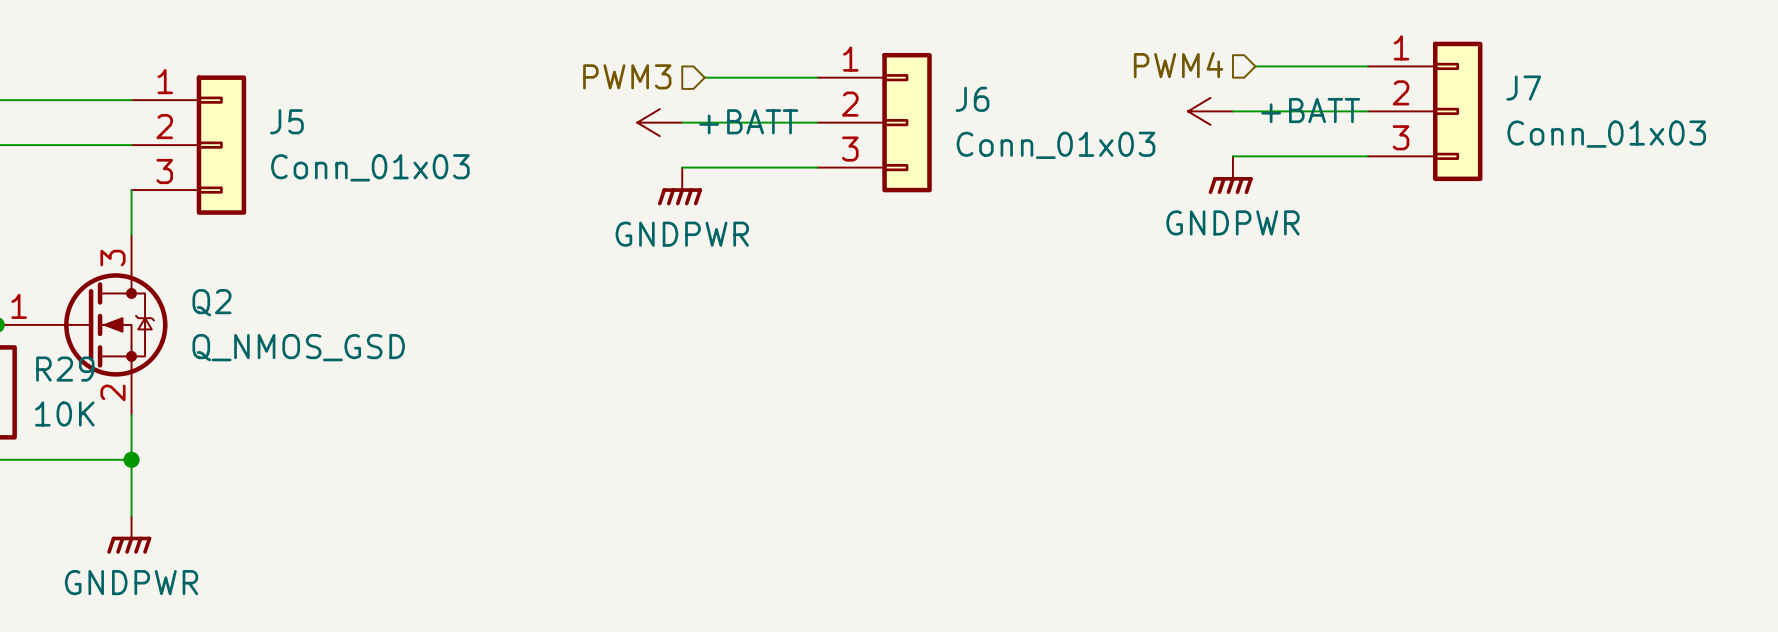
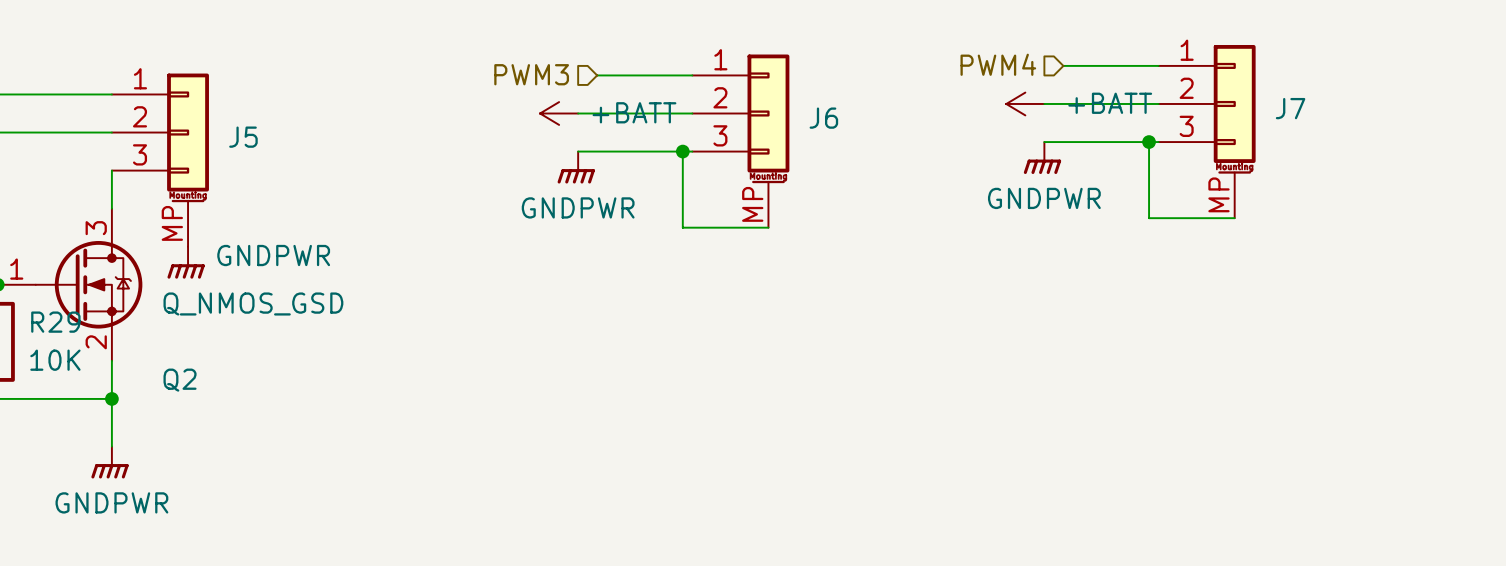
J7 symbol: [1367, 41, 1483, 182] -> [1158, 44, 1256, 219]
J6 symbol: [817, 52, 932, 193] -> [692, 54, 790, 228]
J5 symbol: [131, 75, 247, 215] -> [111, 73, 209, 247]
J7 value: Conn_01x03 (1606, 134) -> none
J6 value: Conn_01x03 (1055, 145) -> none
wire: none -> (1149, 142) (1149, 218) (1234, 218)
junction: none -> (1149, 142)
J5 value: Conn_01x03 (370, 167) -> none
wire: none -> (682, 151) (682, 227) (768, 227)
junction: none -> (682, 151)
power symbol: none -> GNDPWR (186, 262)
Q2 name position: Q2 (211, 302) -> Q2 (180, 380)

